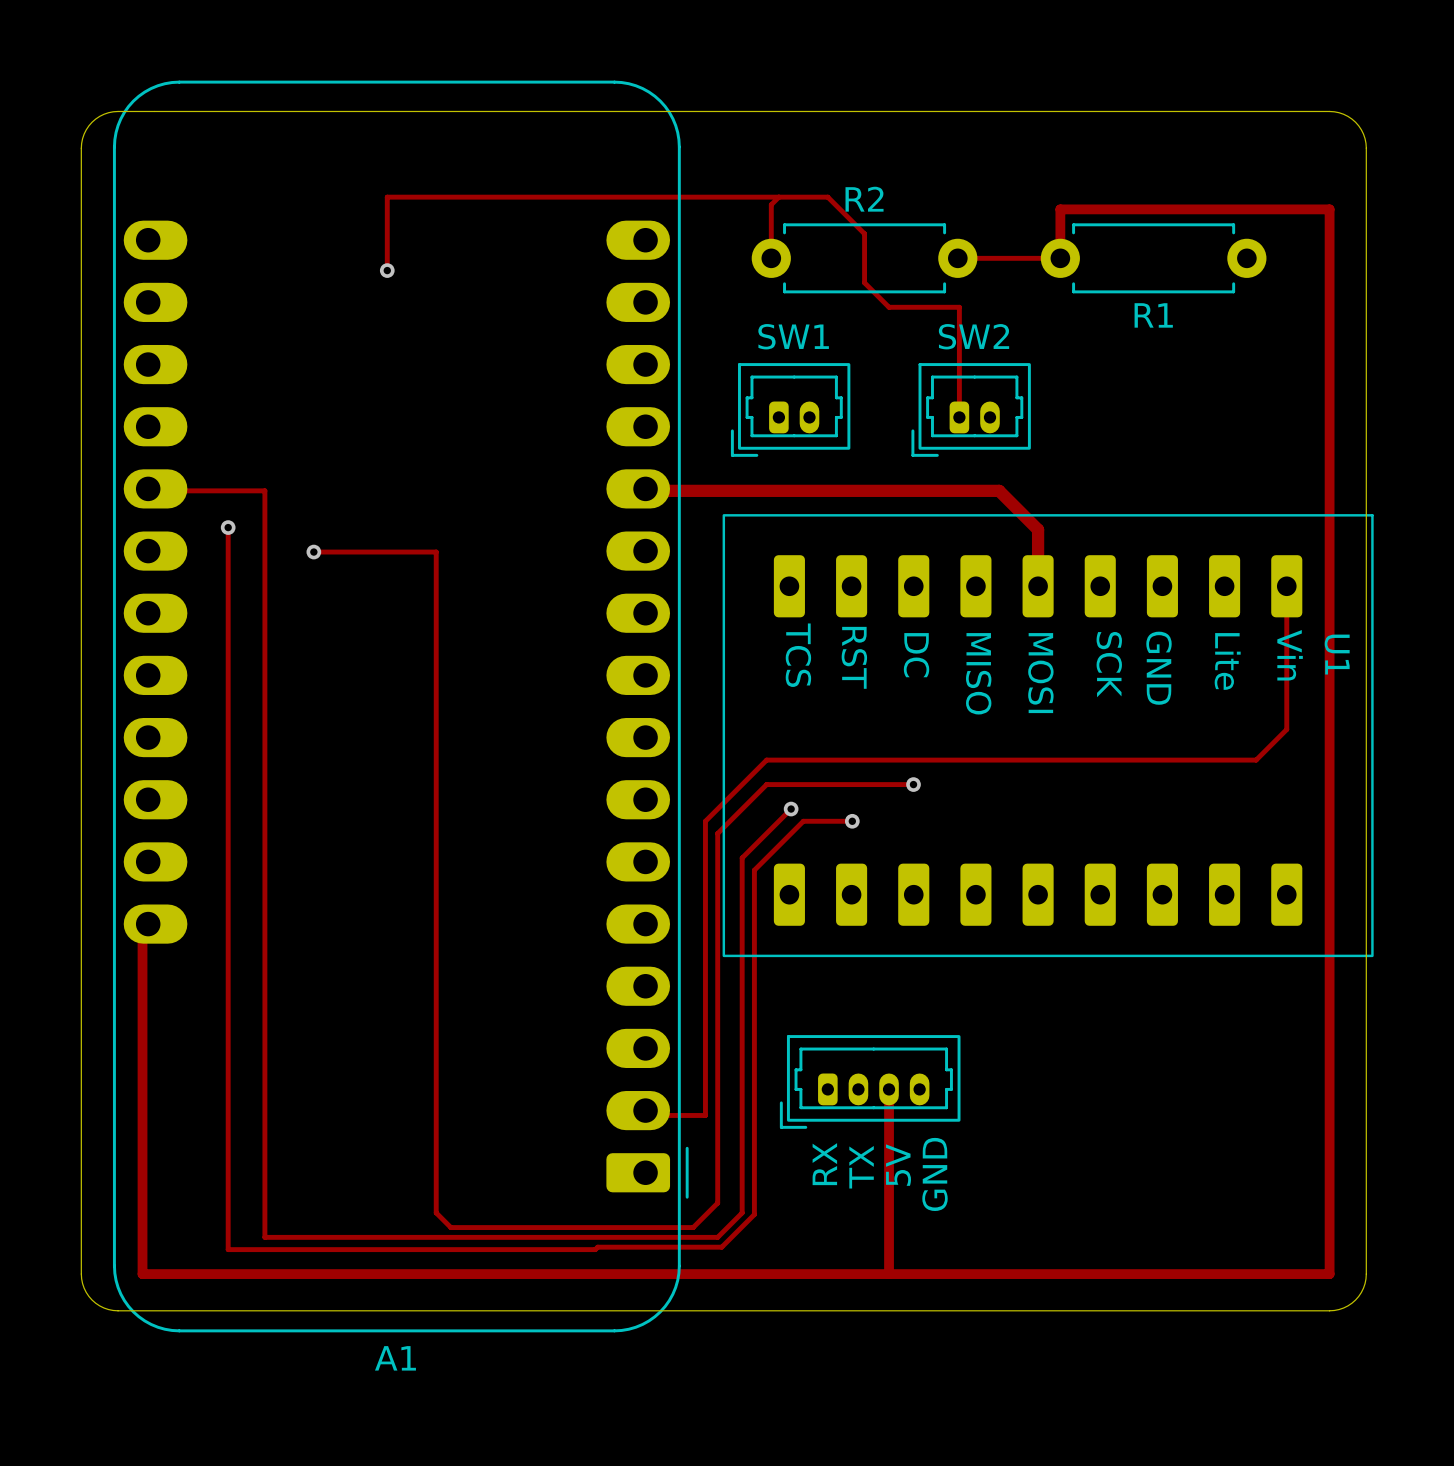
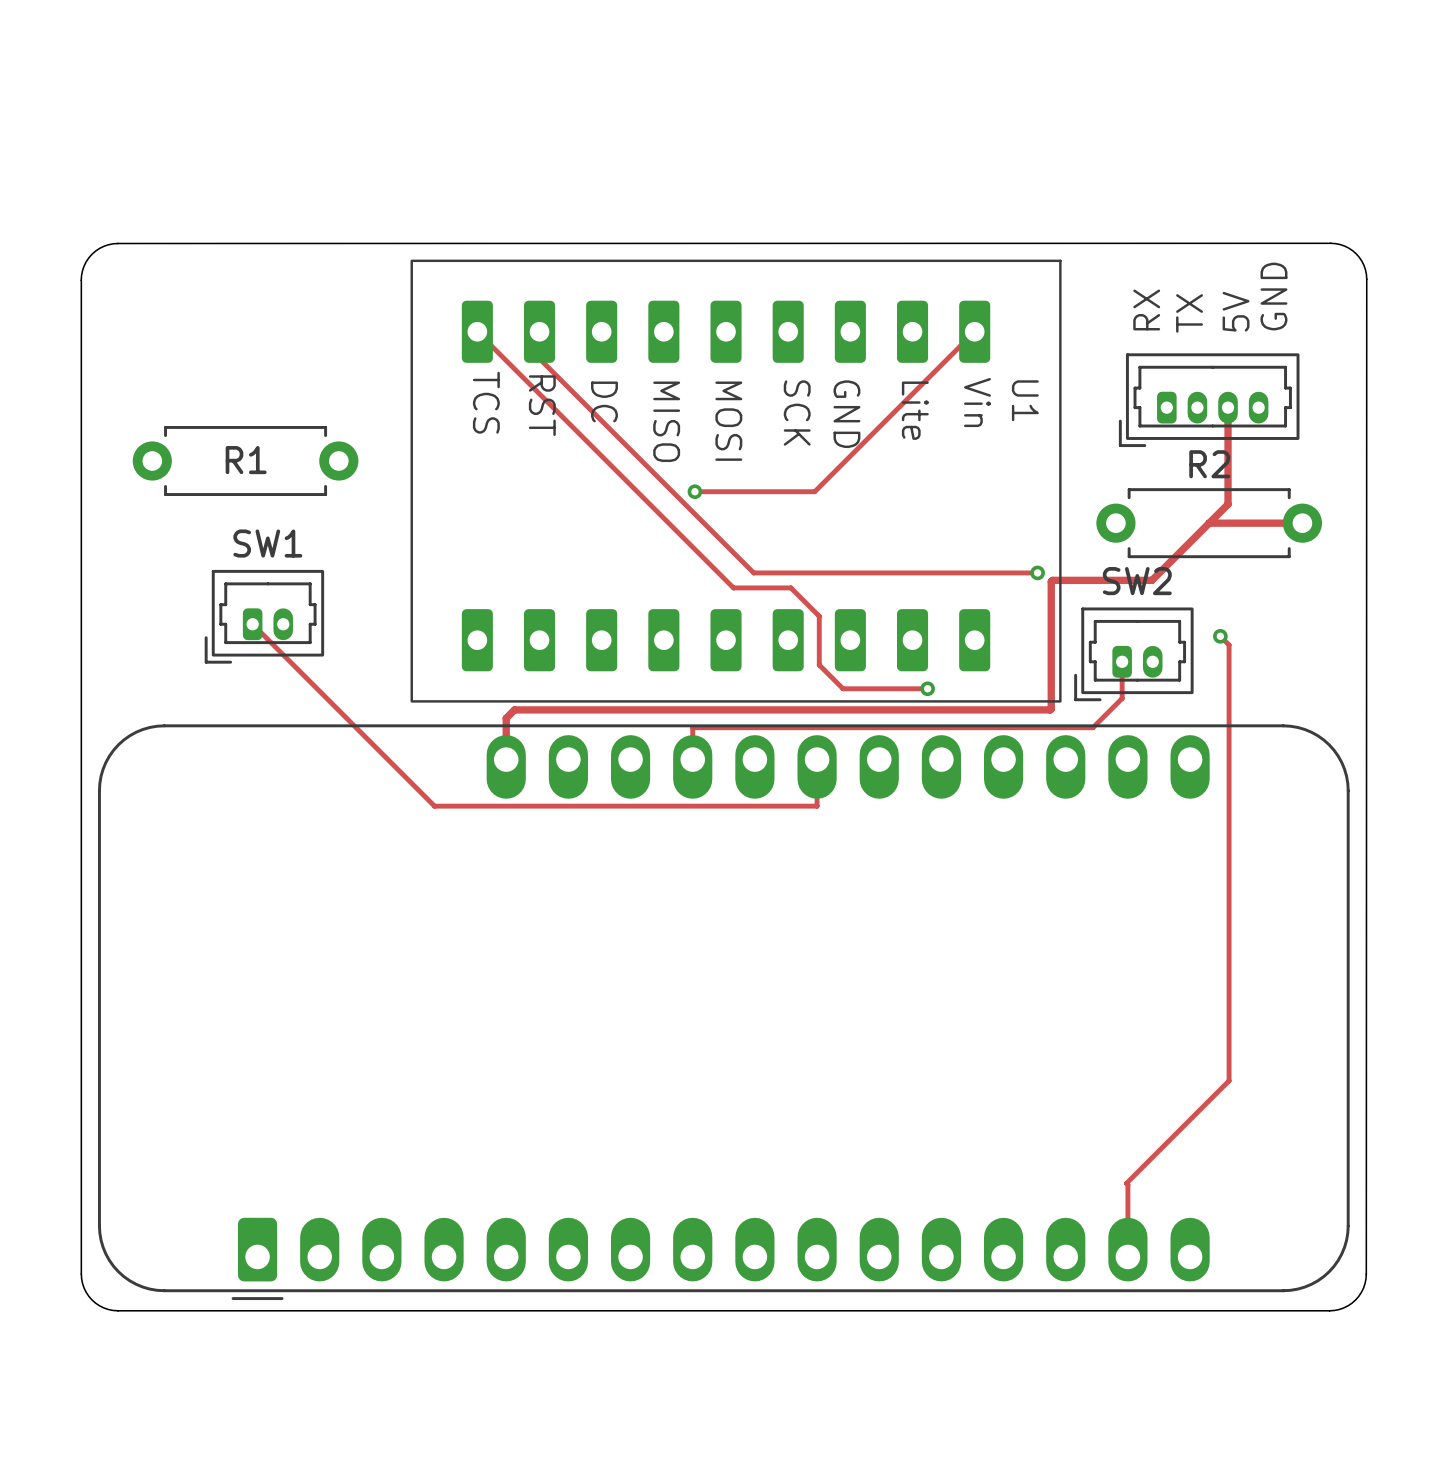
track: (778, 197) (771, 204) (771, 258) -> none
board edge: none -> (117, 243) (103, 246) (92, 254) (84, 266) (81, 280)
R2 position: (864, 258) -> (1209, 523)
track: (957, 258) (1060, 258) (1060, 209) (1329, 209) (1329, 1274) (142, 1274) (142, 934) (148, 928) -> none
R1 position: (1153, 258) -> (245, 460)
track: (387, 270) (387, 197) (827, 197) (864, 233) (864, 282) (889, 307) (959, 307) (959, 417) -> none
via: (387, 270) -> none
board edge: (81, 280) (81, 143) (84, 134) (92, 122) (99, 116) (113, 111) (1329, 111) (1339, 112) (1351, 119) (1361, 129) (1366, 148) (1366, 1274) -> (117, 243) (1330, 243) (1340, 244) (1352, 250) (1364, 265) (1366, 279) (1366, 1274)
text: none -> GND (1273, 296)
text: none -> RX (1146, 309)
text: none -> 5V (1236, 311)
text: none -> TX (1189, 313)
R1 name position: R1 (1153, 315) -> R1 (246, 460)
track: none -> (477, 331) (733, 587) (790, 587) (819, 616) (819, 665) (843, 688) (927, 688)
track: none -> (539, 331) (539, 358) (753, 572) (1037, 572)
track: none -> (974, 331) (814, 491) (694, 491)
part: none -> (1209, 400)
track: none -> (1228, 407) (1228, 504) (1151, 580) (1051, 581) (1050, 709) (514, 709) (506, 718) (506, 766)
SW1 position: (790, 409) -> (264, 616)
SW2 position: (971, 409) -> (1133, 654)
track: (645, 488) (644, 490) (999, 490) (1038, 529) (1038, 586) -> none
via: none -> (694, 491)
track: (148, 493) (151, 490) (264, 490) (264, 1237) (717, 1237) (742, 1212) (742, 857) (791, 809) -> none
track: none -> (1209, 523) (1302, 523)
track: (228, 527) (228, 1249) (595, 1249) (597, 1247) (721, 1247) (754, 1214) (754, 870) (803, 821) (852, 821) -> none
via: (228, 527) -> none
track: (313, 552) (436, 552) (436, 1212) (450, 1227) (693, 1227) (717, 1203) (717, 833) (766, 784) (913, 784) -> none
via: (313, 552) -> none
via: none -> (1037, 572)
track: (1286, 586) (1286, 729) (1256, 760) (766, 760) (705, 821) (705, 1115) (638, 1115) -> none
track: none -> (252, 624) (434, 806) (817, 806) (817, 759)
track: none -> (1220, 636) (1229, 645) (1229, 1080) (1126, 1183) (1127, 1256)
via: none -> (1220, 636)
track: none -> (1122, 661) (1122, 698) (1092, 727) (692, 727) (692, 759)
via: none -> (927, 688)
A1: (400, 706) -> none
U1 position: (1048, 735) -> (736, 481)
via: (913, 784) -> none
via: (791, 809) -> none
via: (852, 821) -> none
part: none -> (723, 1012)
part: (870, 1081) -> none
track: (889, 1089) (889, 1274) -> none
text: RX (824, 1164) -> none
text: 5V (898, 1165) -> none
text: TX (861, 1167) -> none
text: GND (935, 1174) -> none

